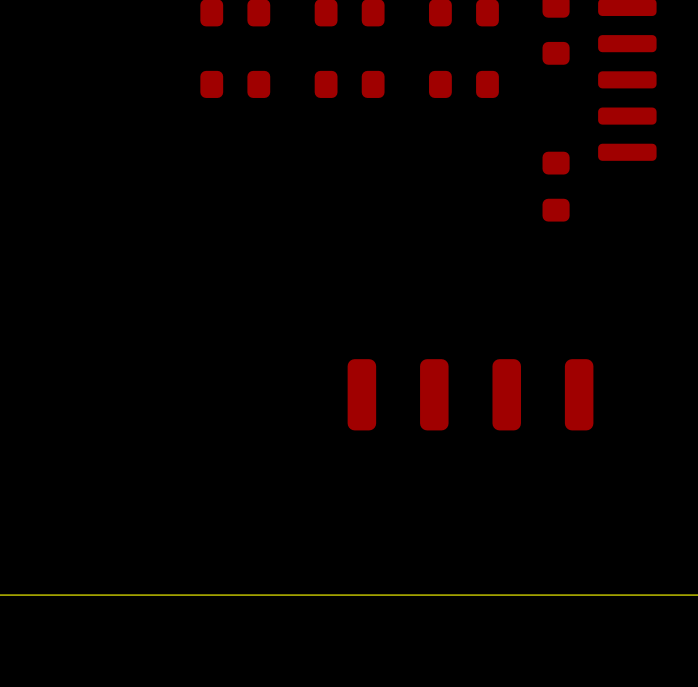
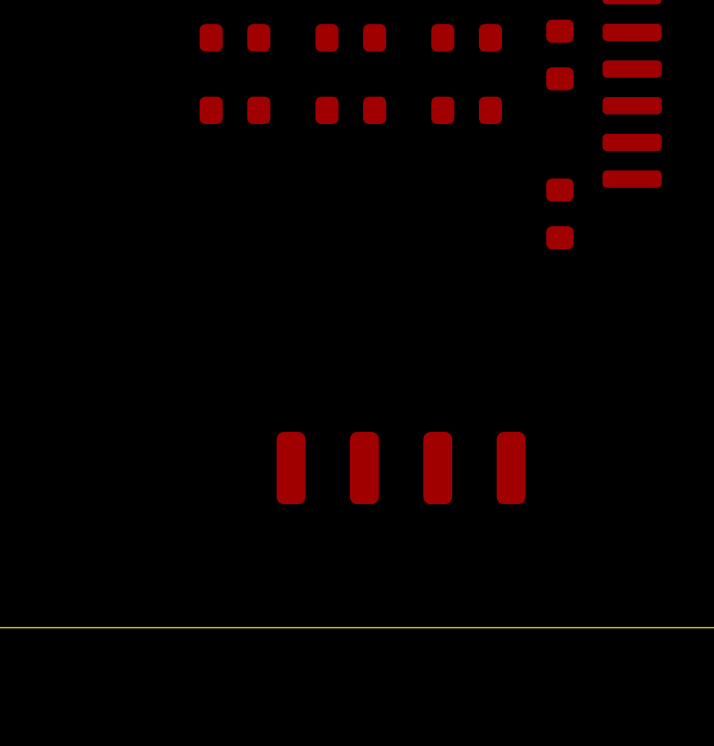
part position: (470, 394) -> (401, 468)

